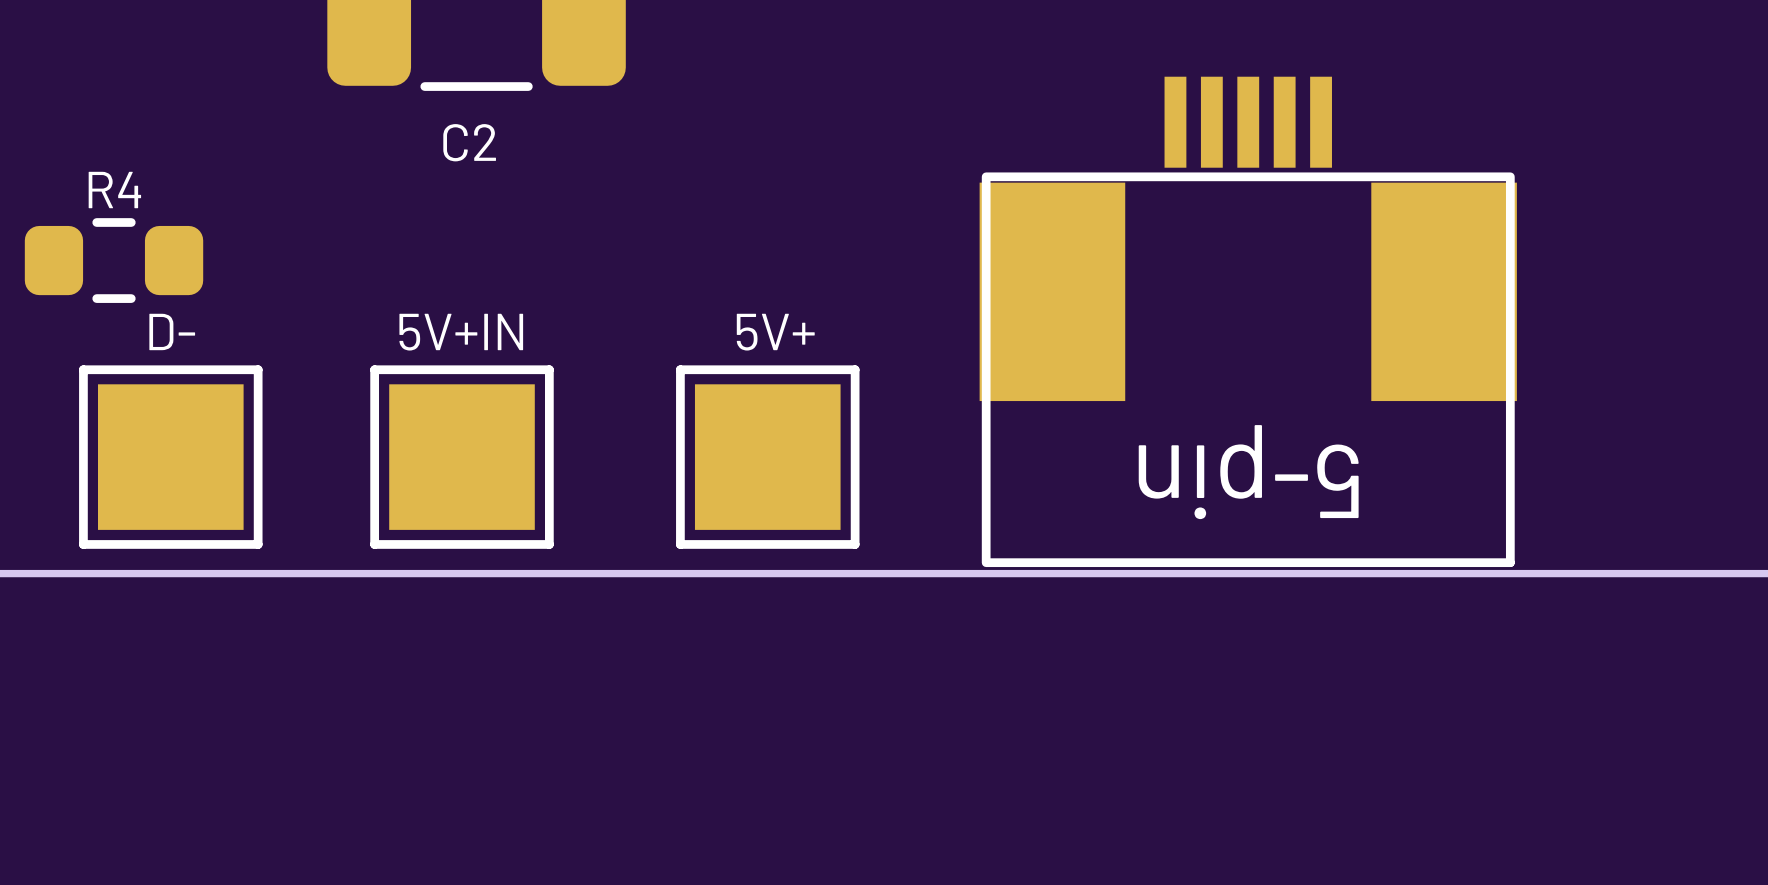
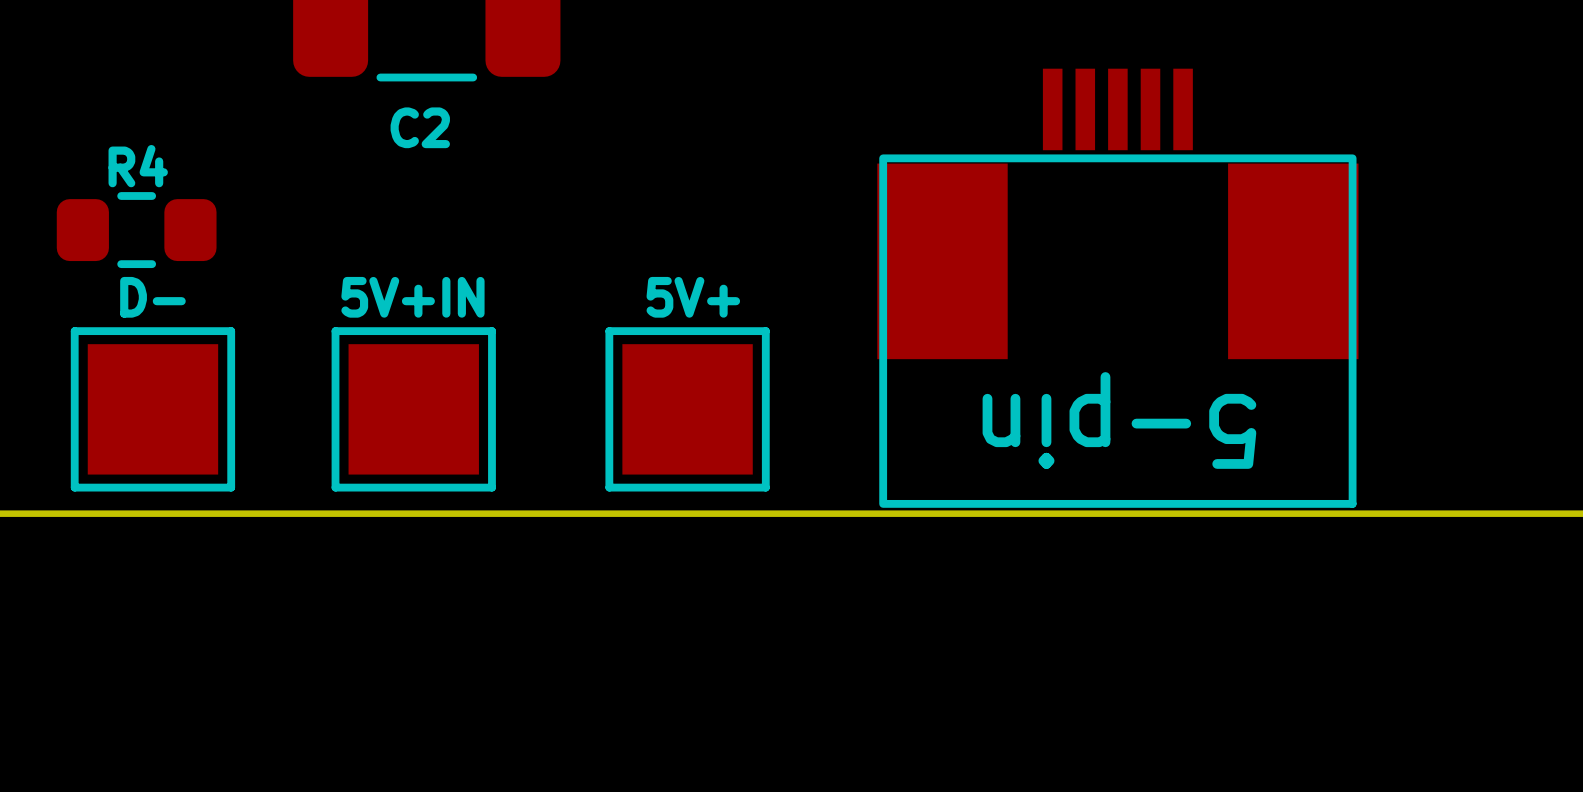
R4 position: (114, 260) -> (136, 230)

